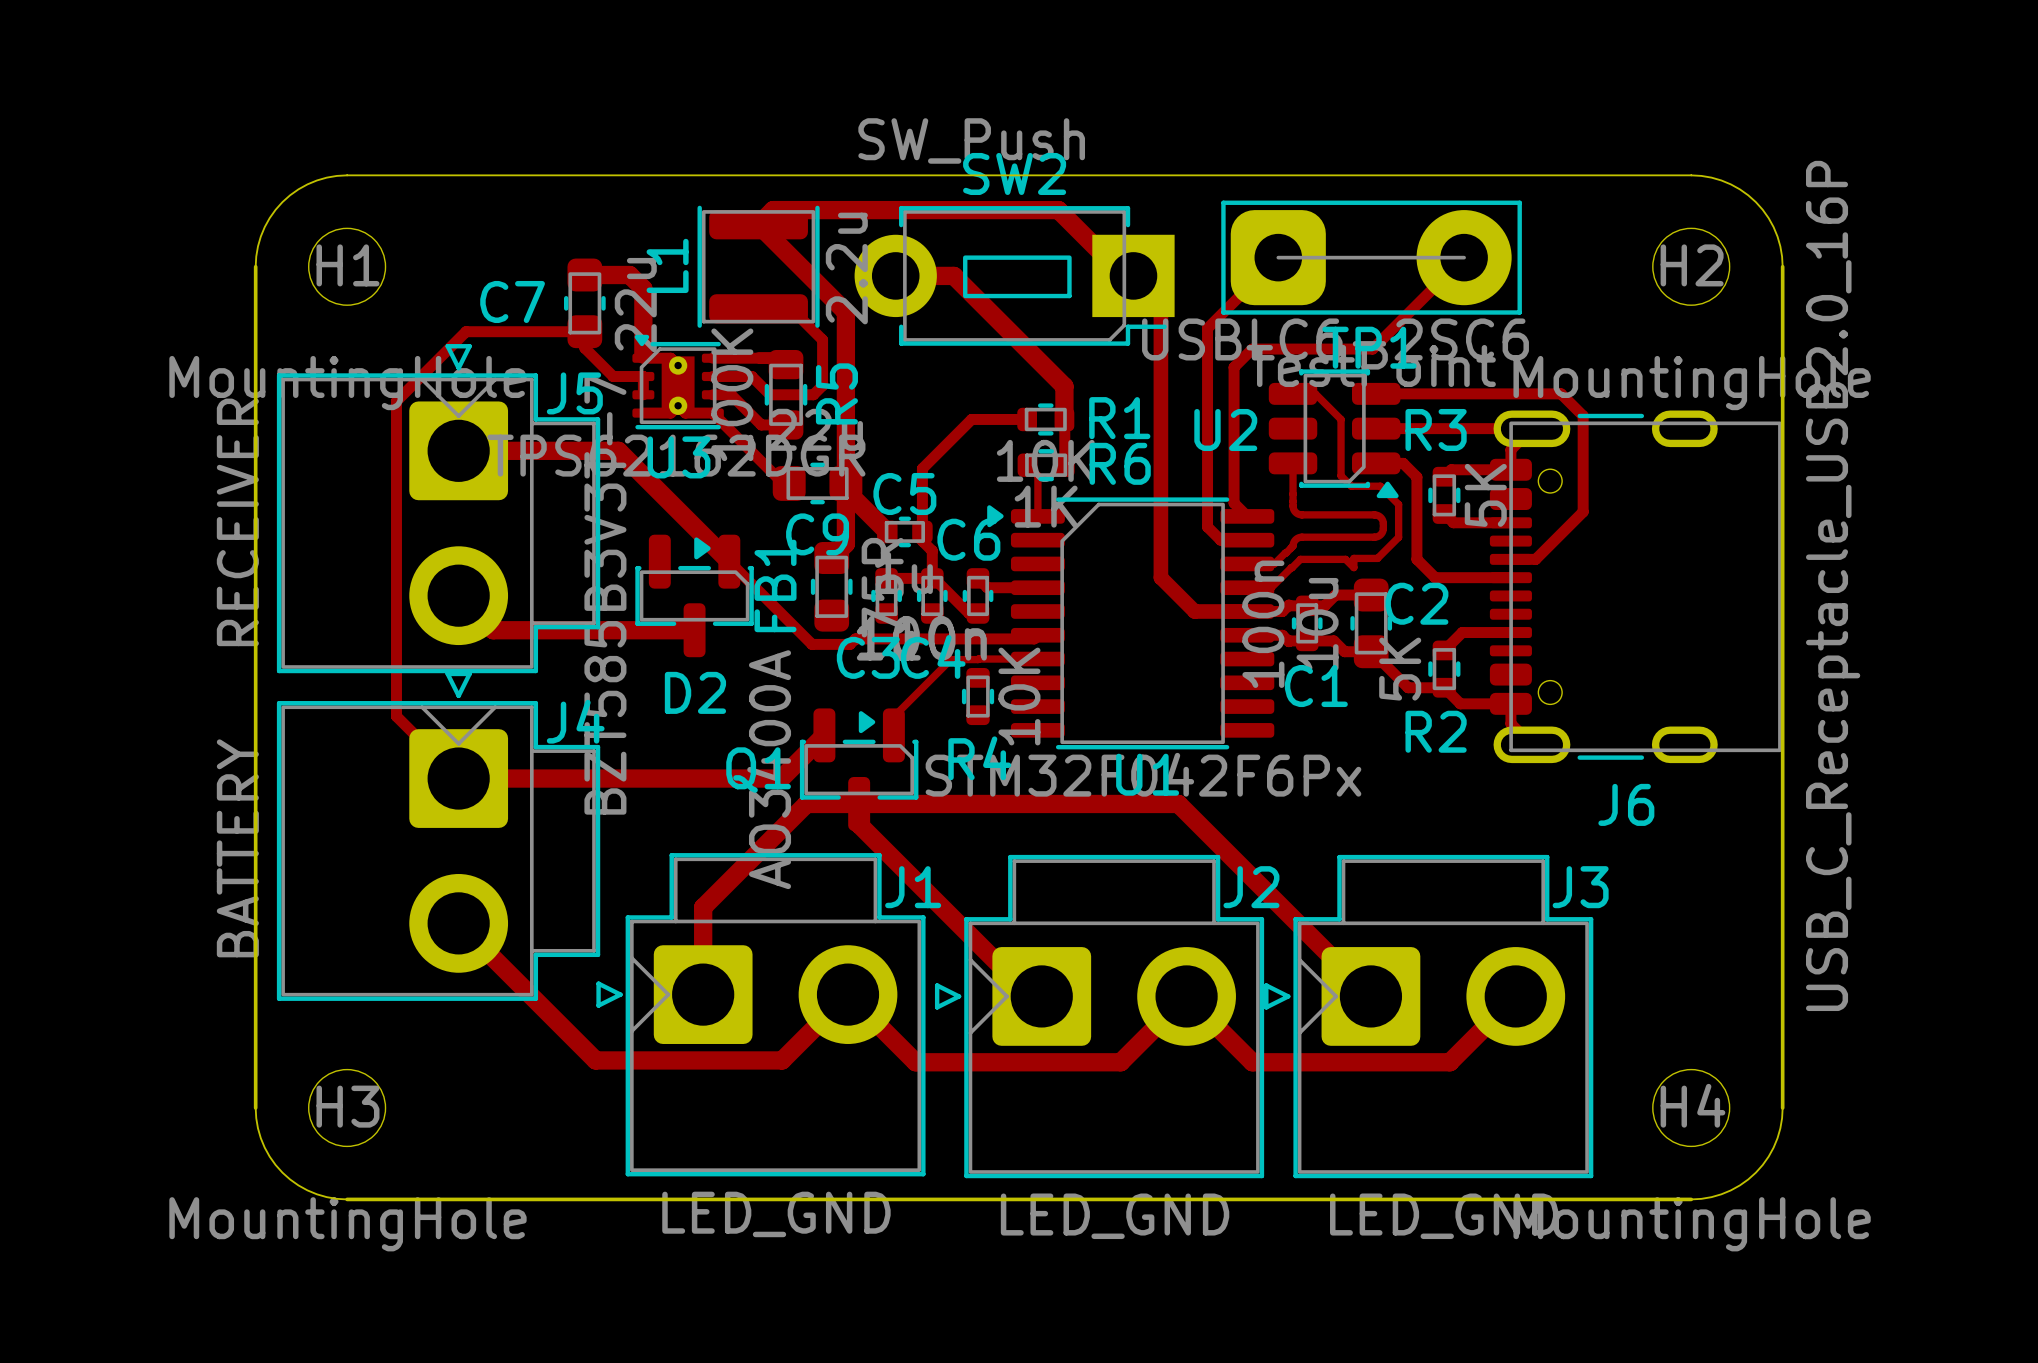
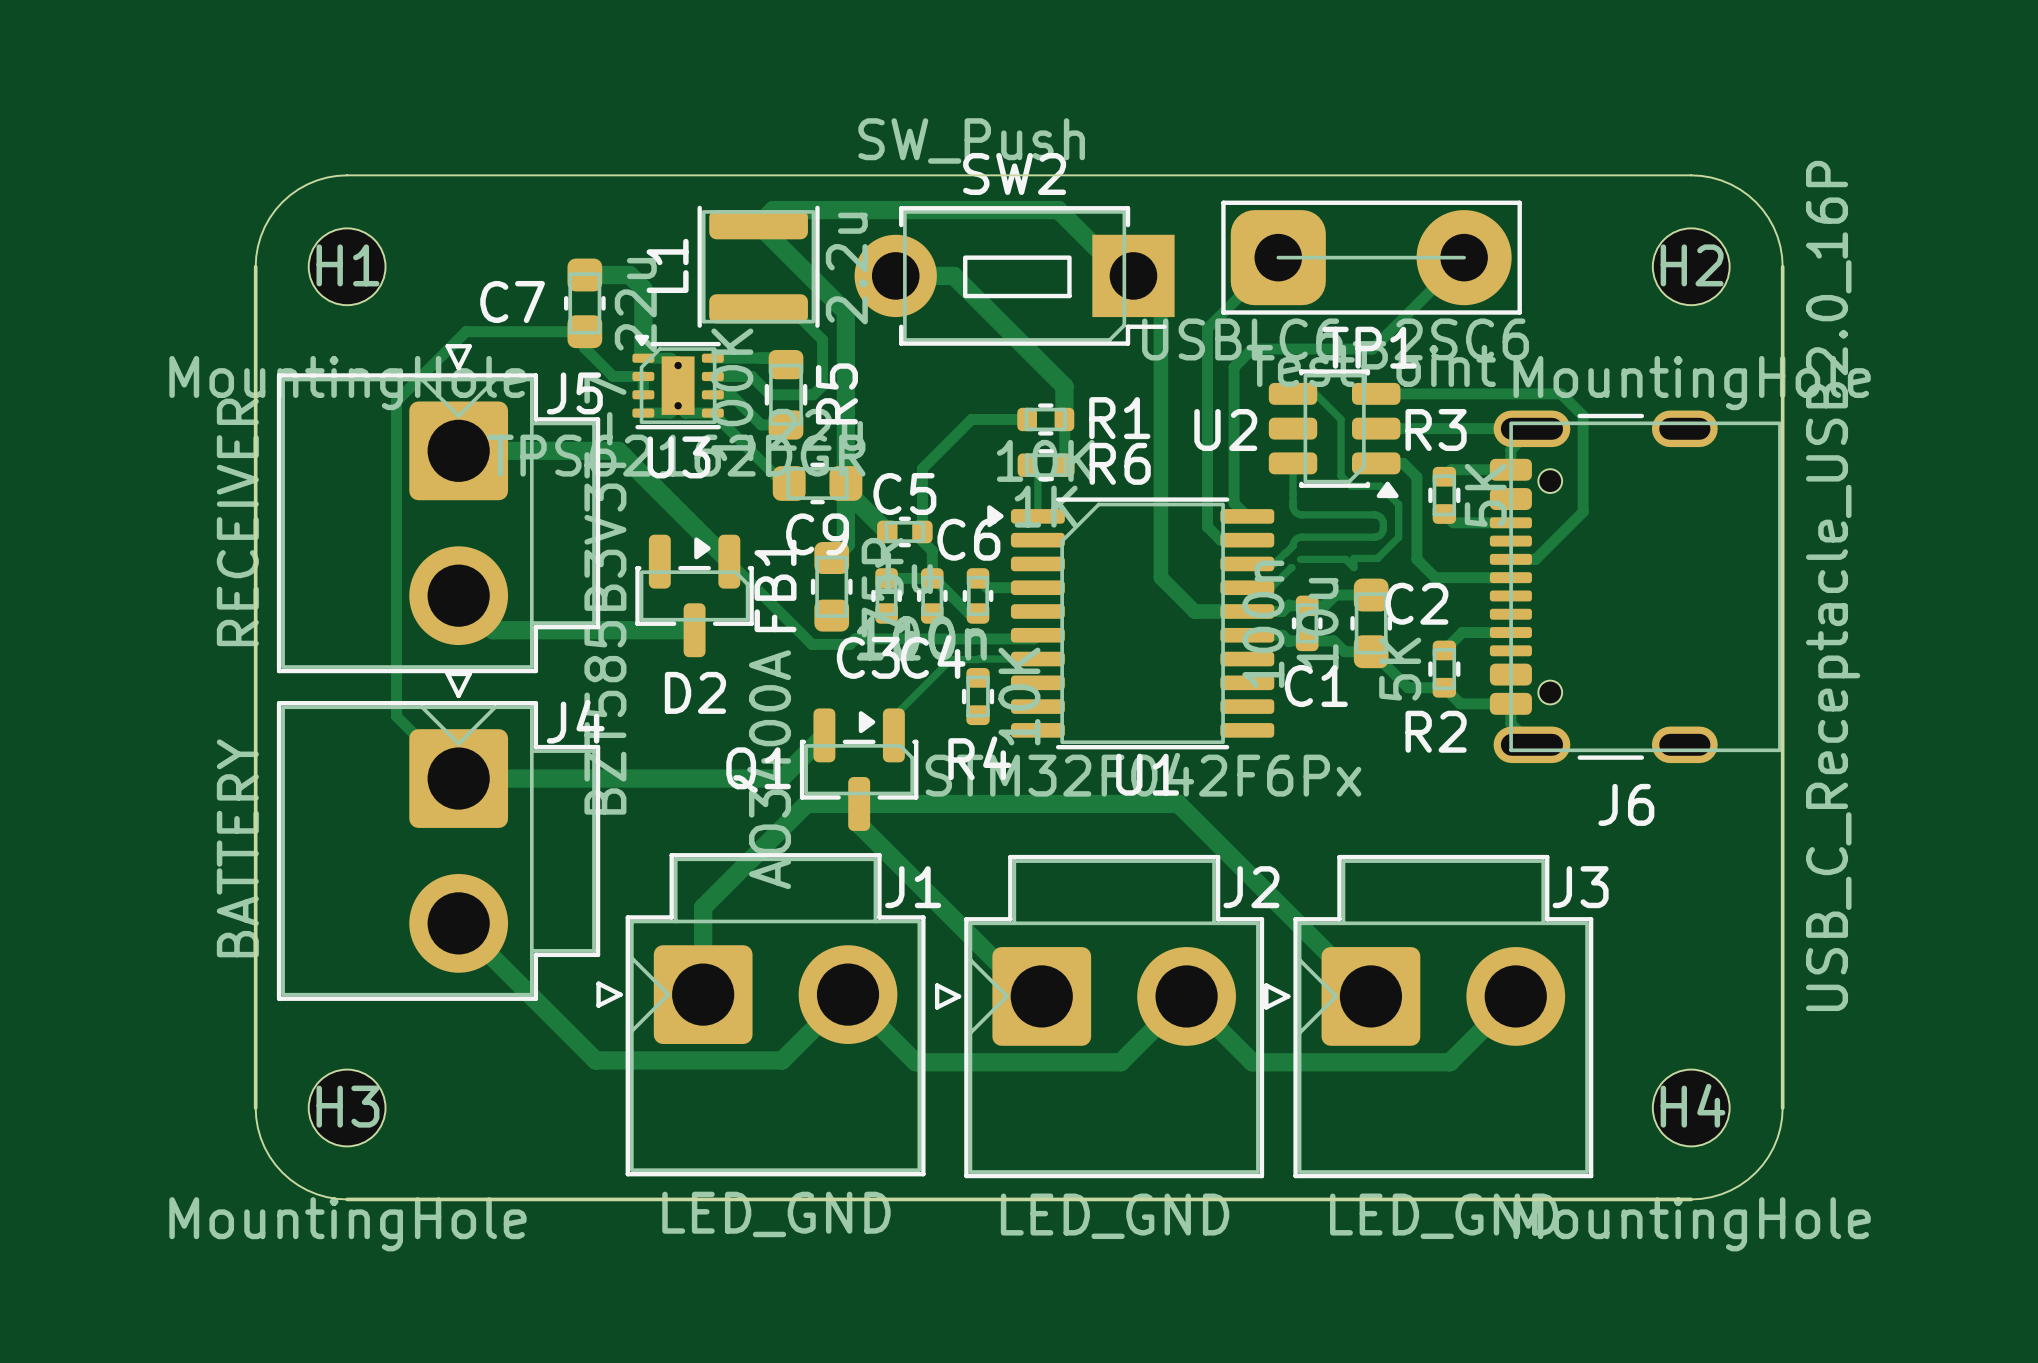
track: (1300, 559) (1292, 567) -> none

